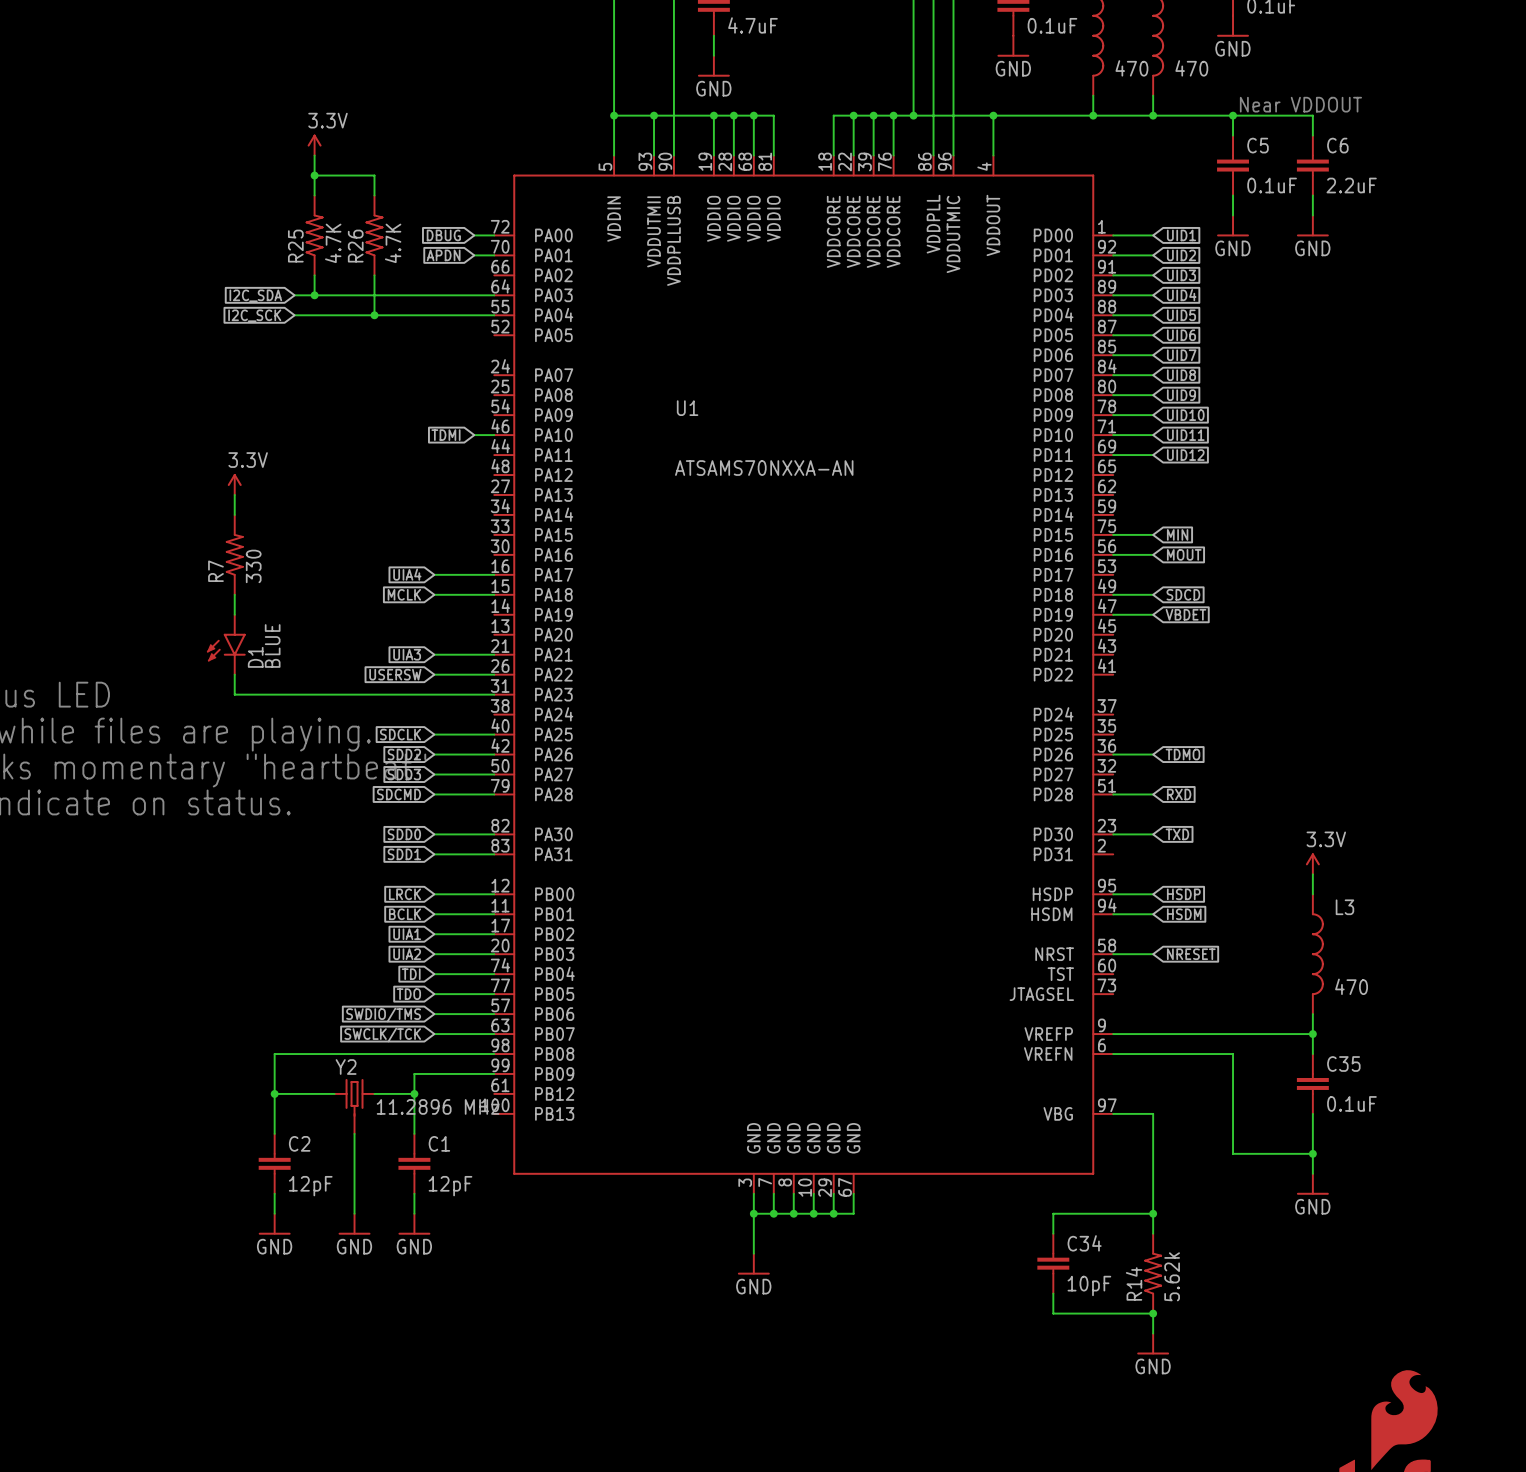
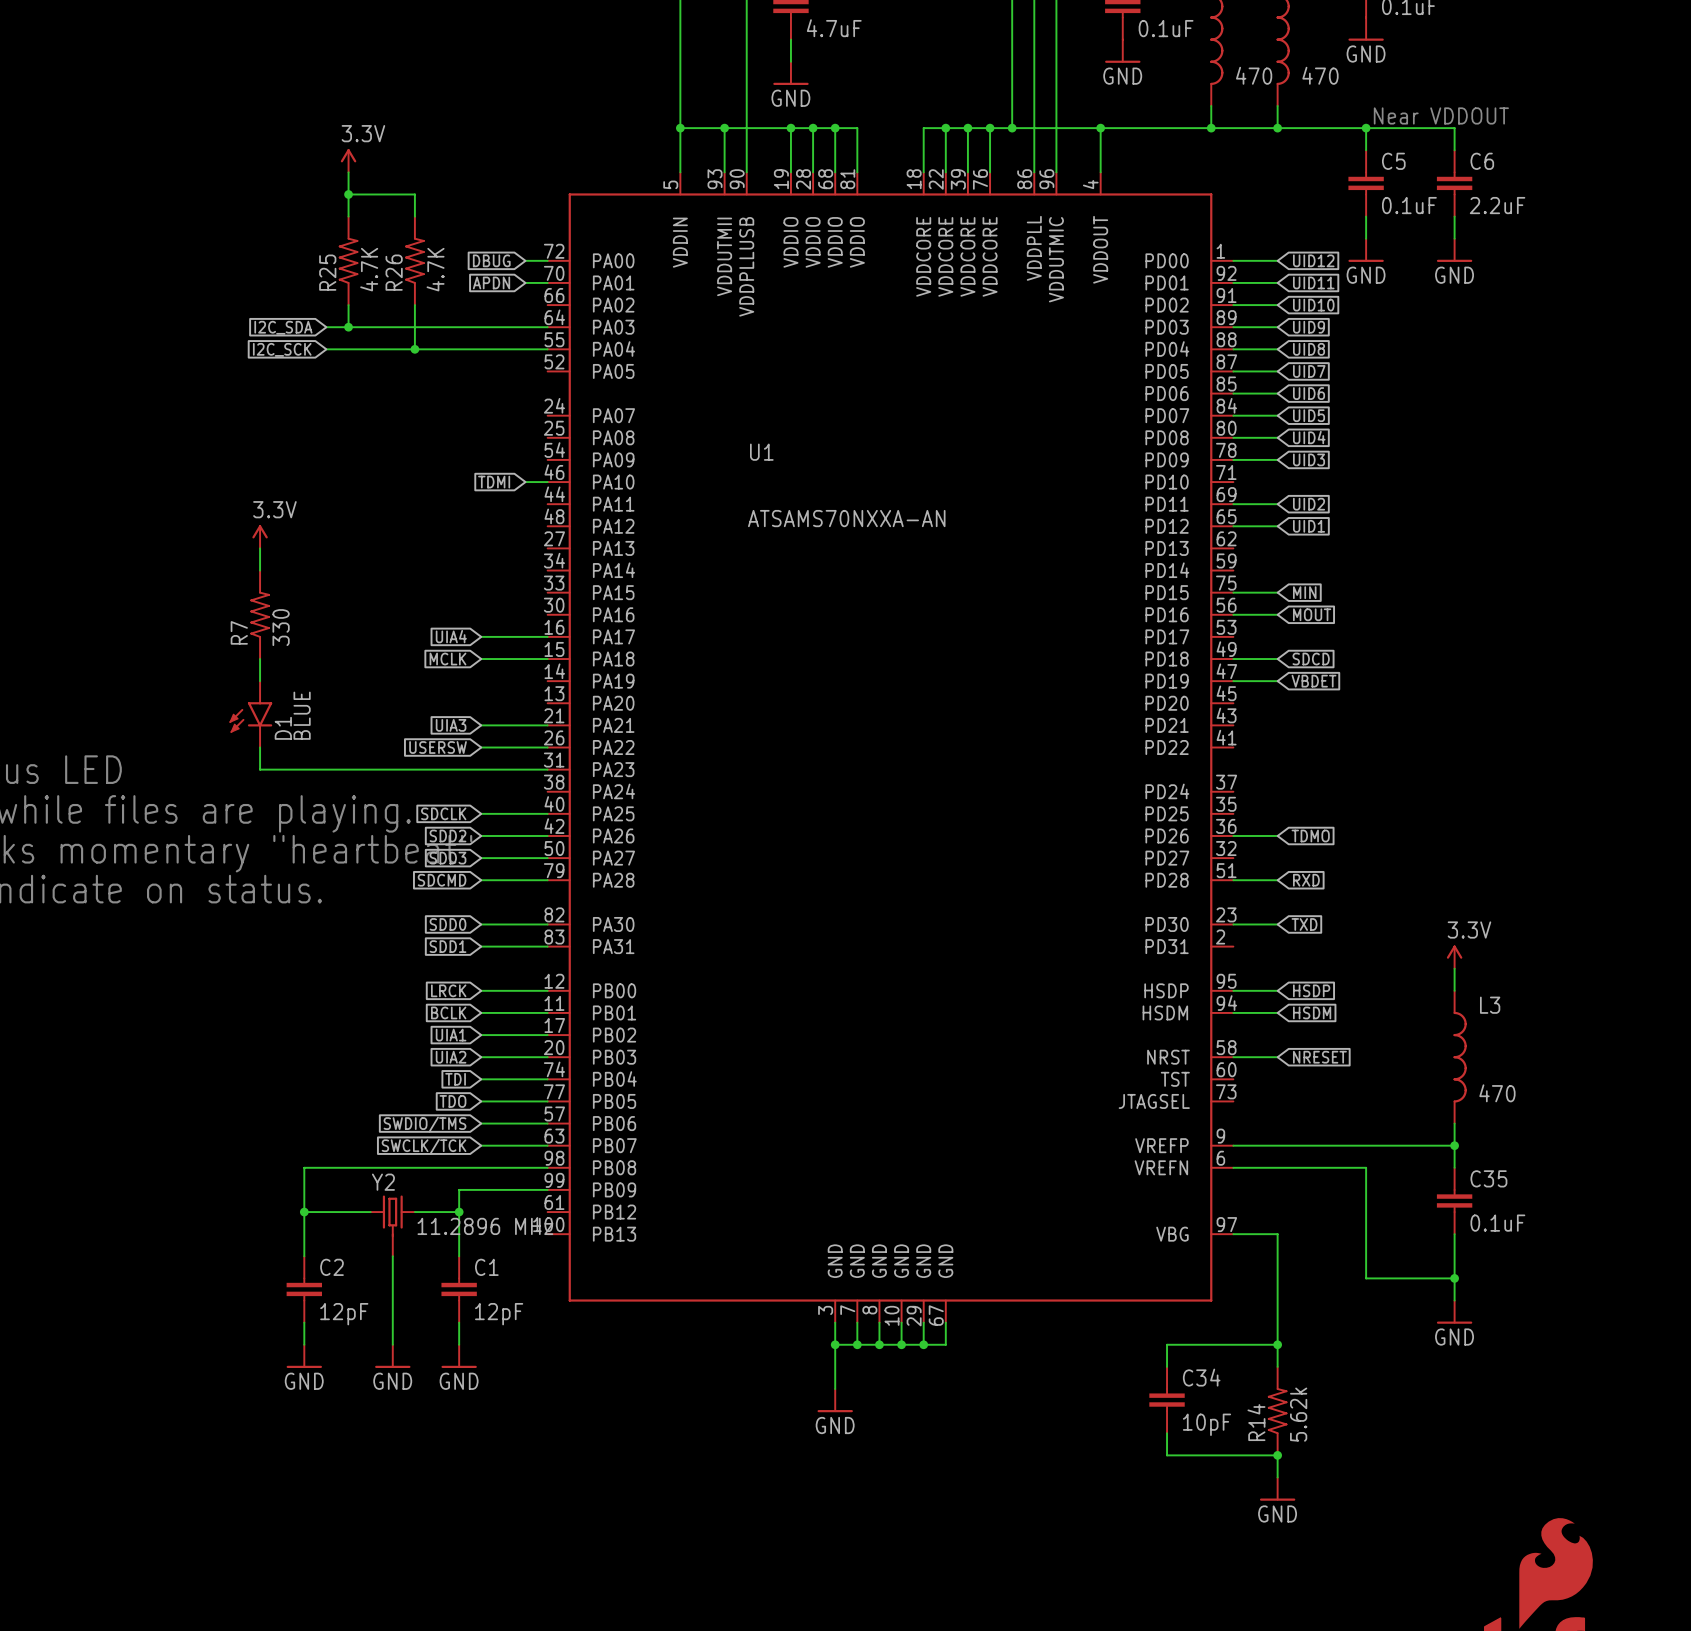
global label: UID1 (1181, 235) -> UID12 (1313, 260)
global label: UID2 (1181, 255) -> UID11 (1313, 282)
global label: UID3 (1181, 275) -> UID10 (1313, 305)
global label: UID4 (1181, 295) -> UID9 (1309, 327)
global label: UID5 (1181, 315) -> UID8 (1309, 349)
global label: UID6 (1181, 335) -> UID7 (1309, 371)
global label: UID7 (1181, 355) -> UID6 (1309, 393)
global label: UID8 (1181, 375) -> UID5 (1309, 415)
global label: UID9 (1181, 395) -> UID4 (1309, 437)
global label: UID10 (1185, 415) -> UID3 (1309, 459)
wire: (1113, 435) (1153, 435) -> (1233, 526) (1277, 526)
global label: UID11 (1185, 435) -> none
global label: UID12 (1185, 455) -> UID2 (1309, 504)
global label: none -> UID1 (1309, 526)

